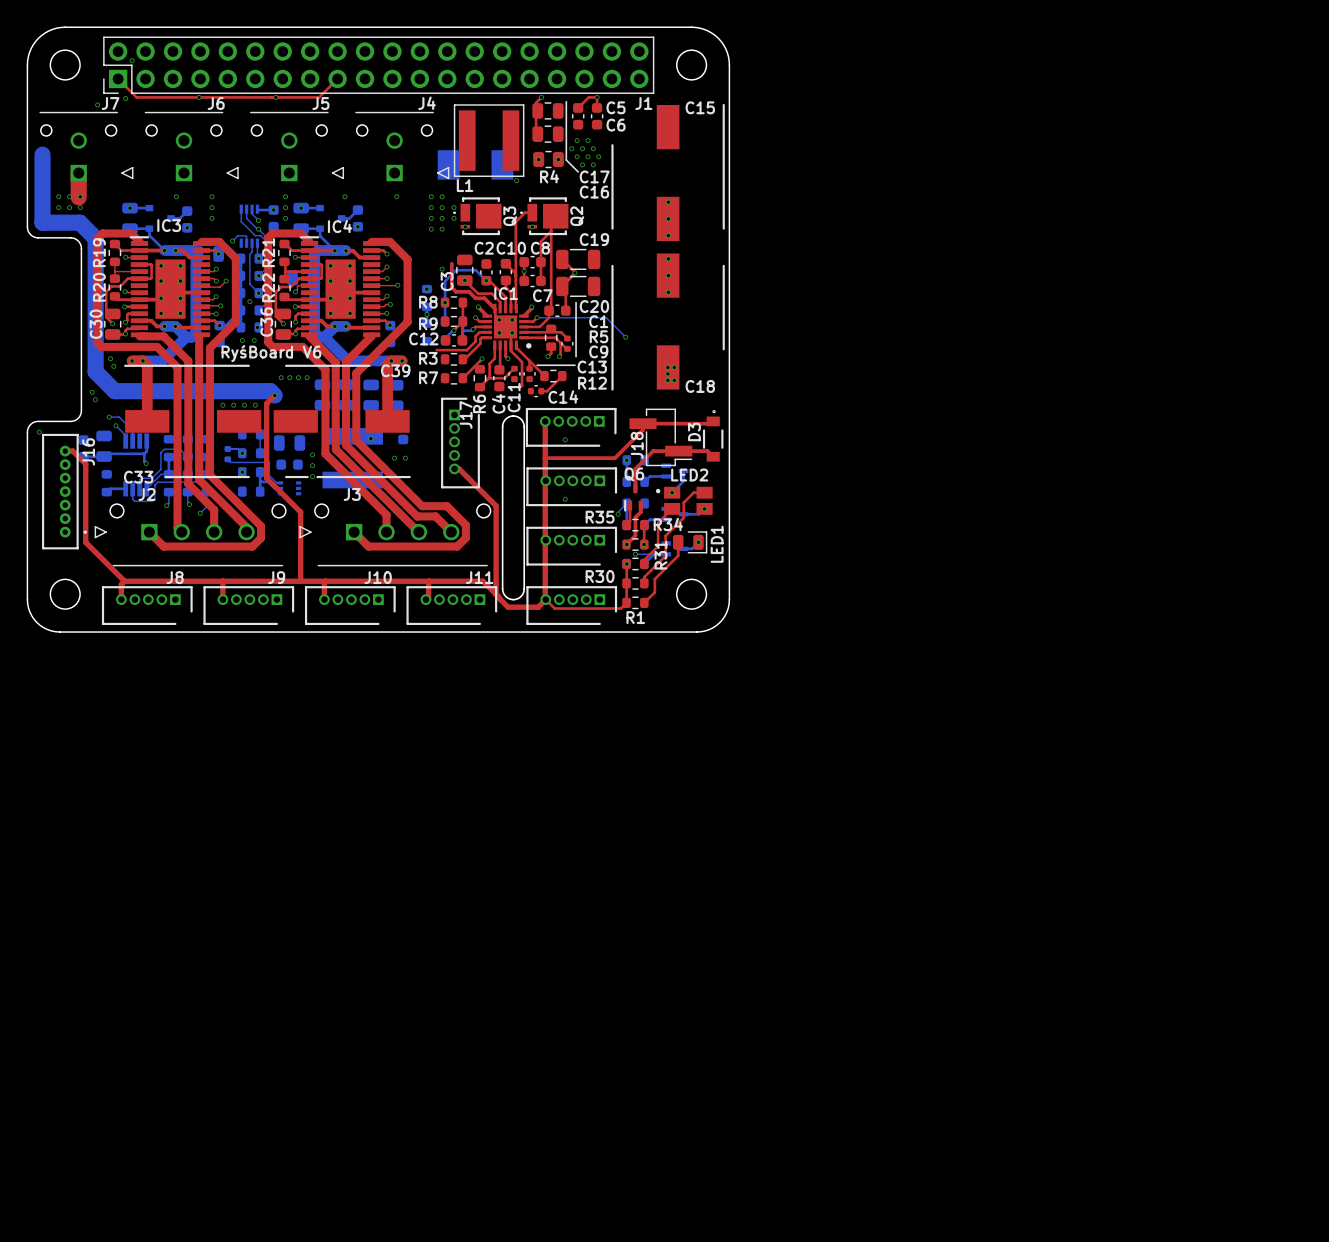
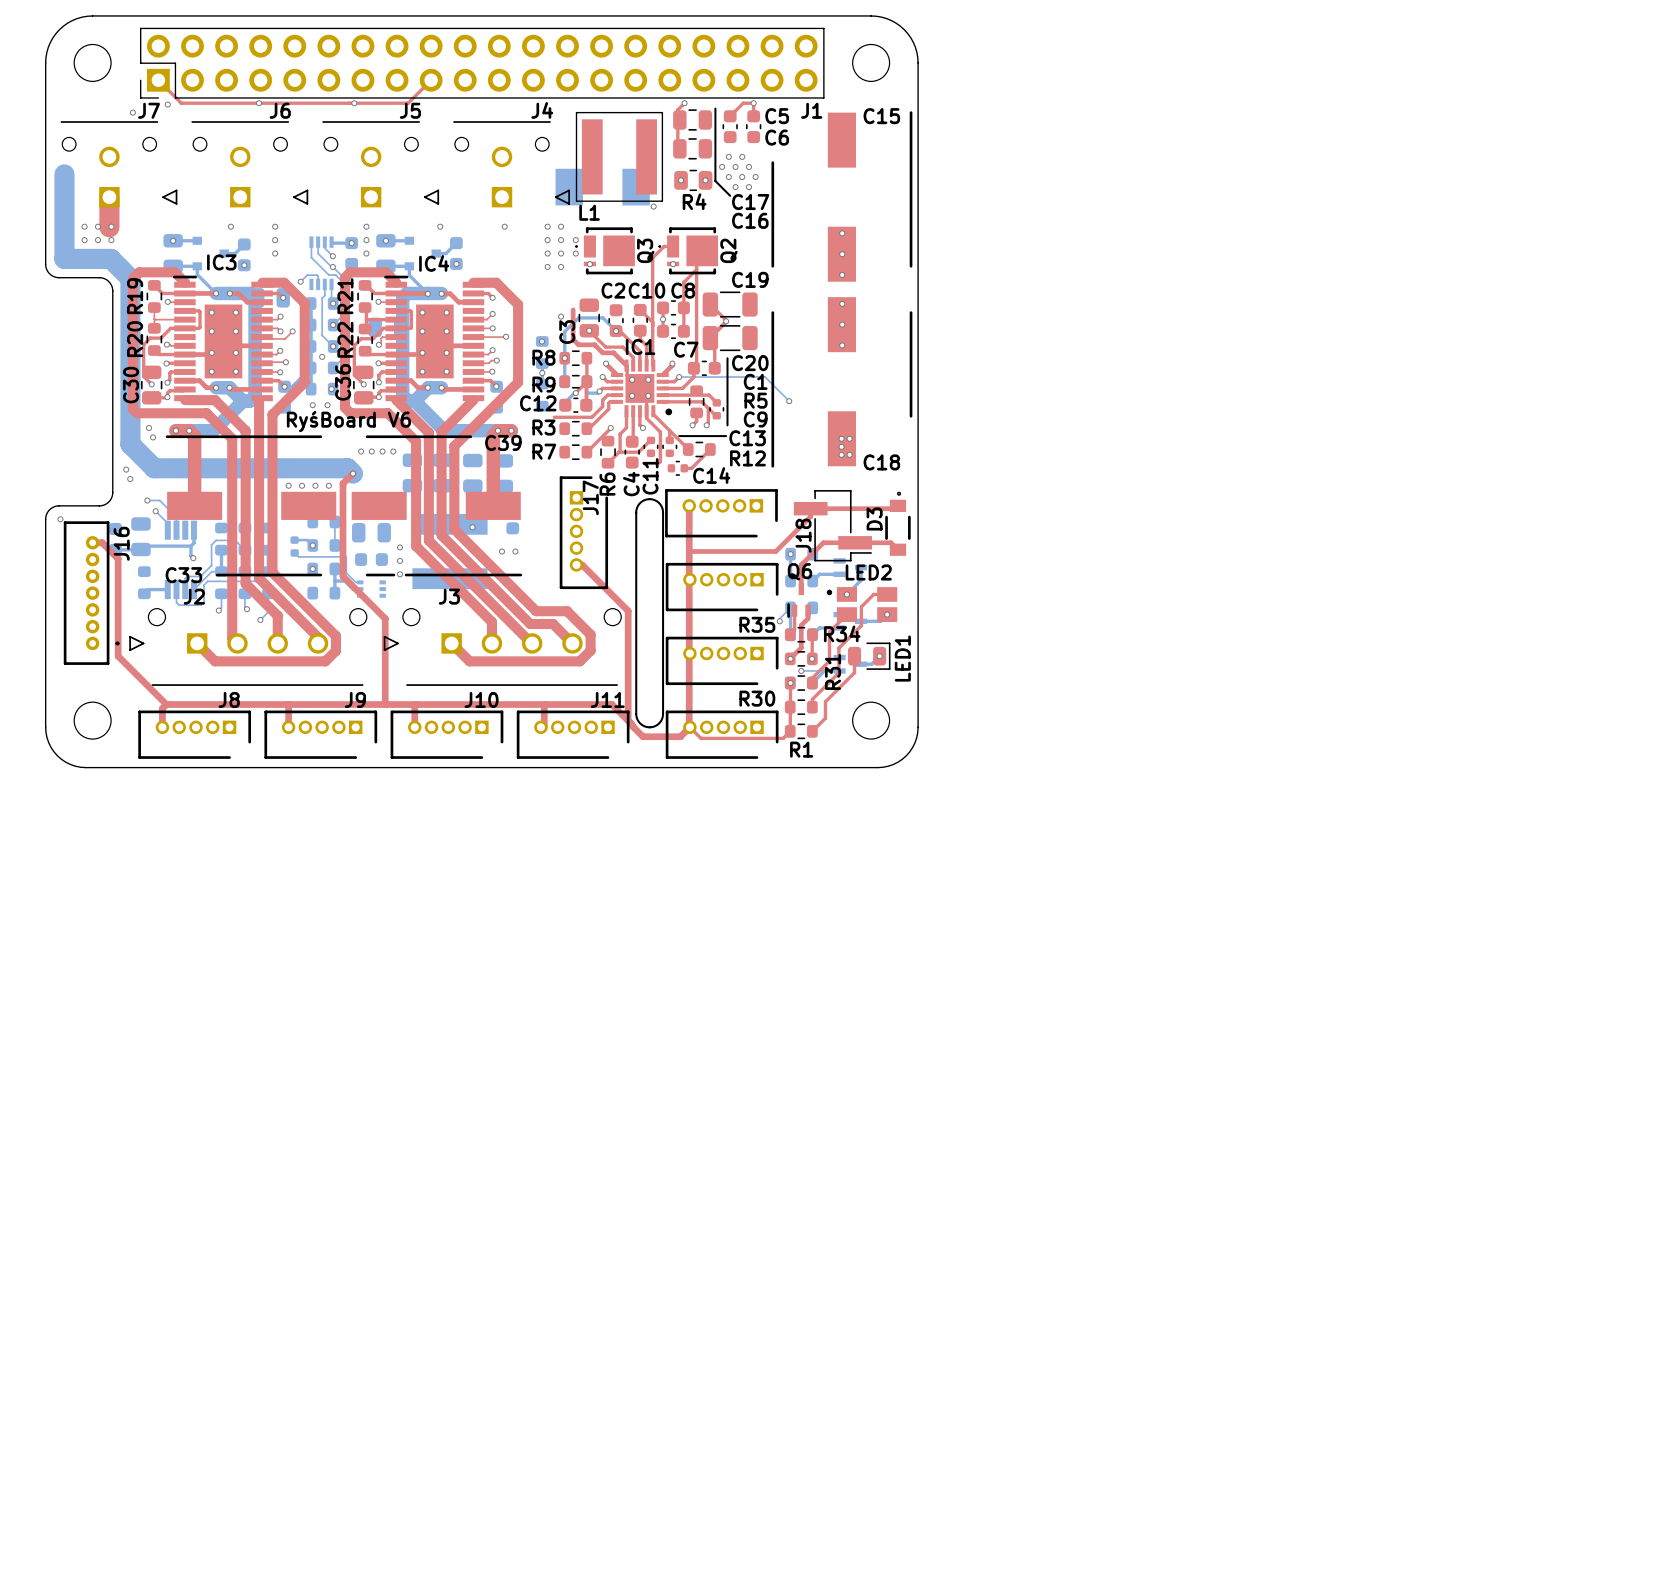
via: (132, 60) -> none
via: (565, 439) -> none
via: (565, 499) -> none

